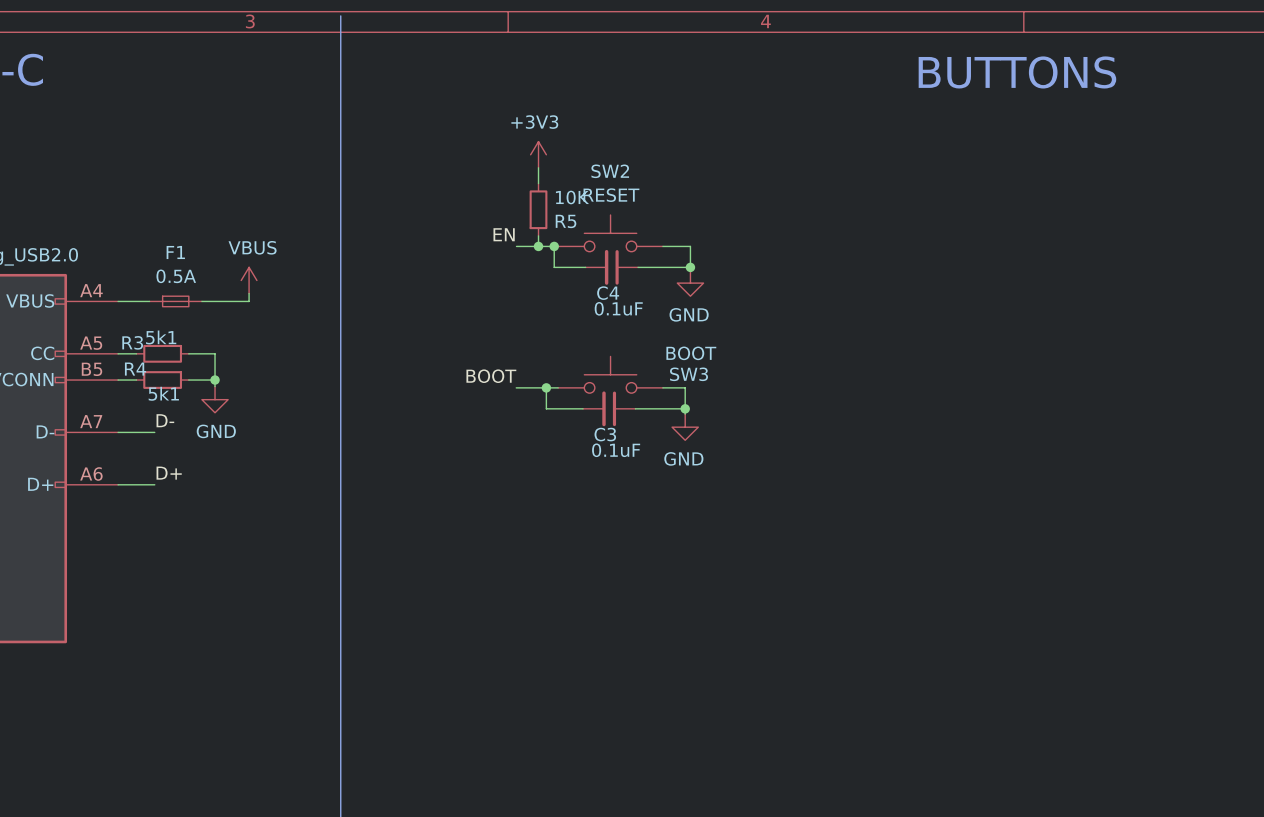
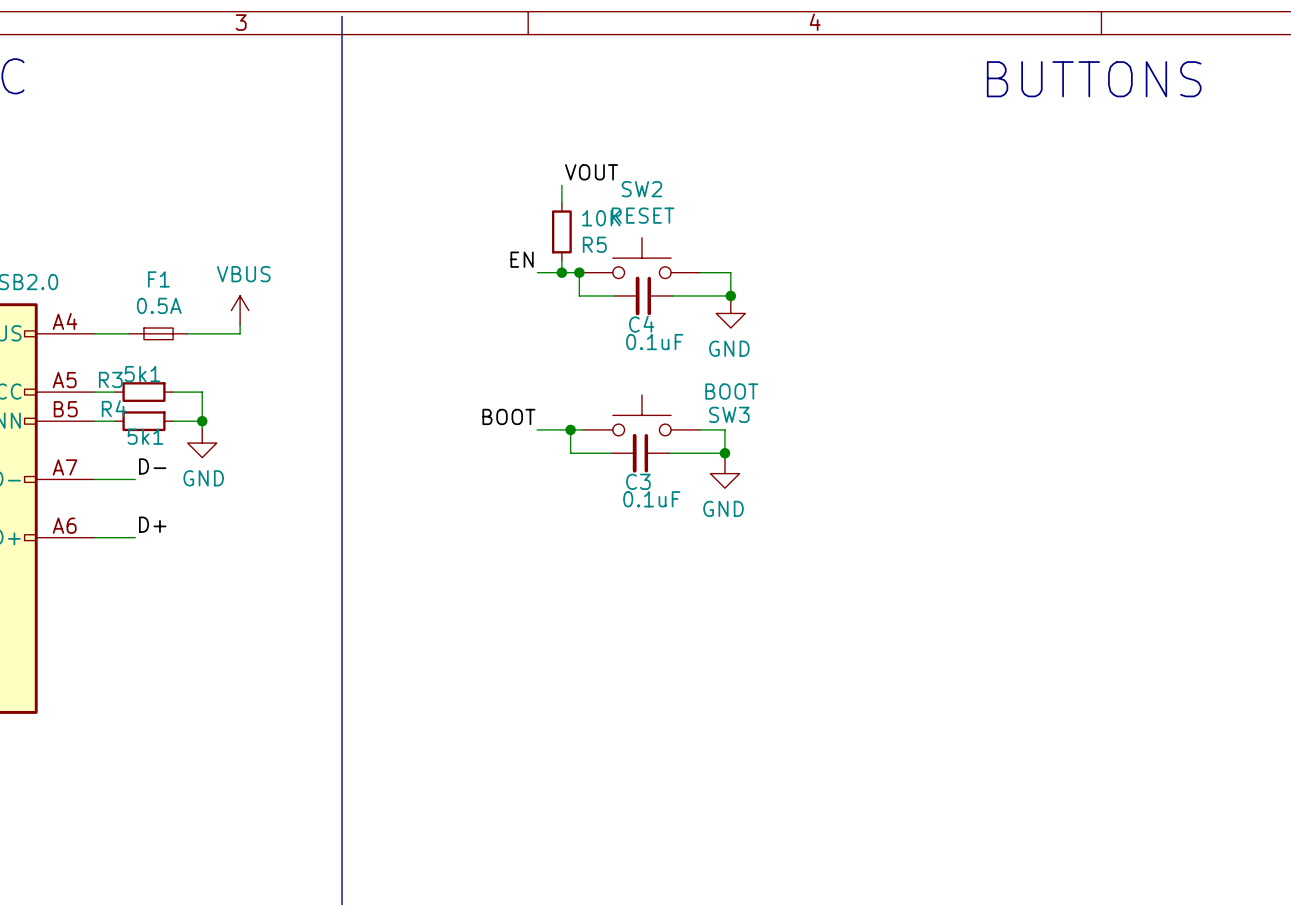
power symbol: +3V3 (538, 154) -> none
label: none -> VOUT (591, 172)

